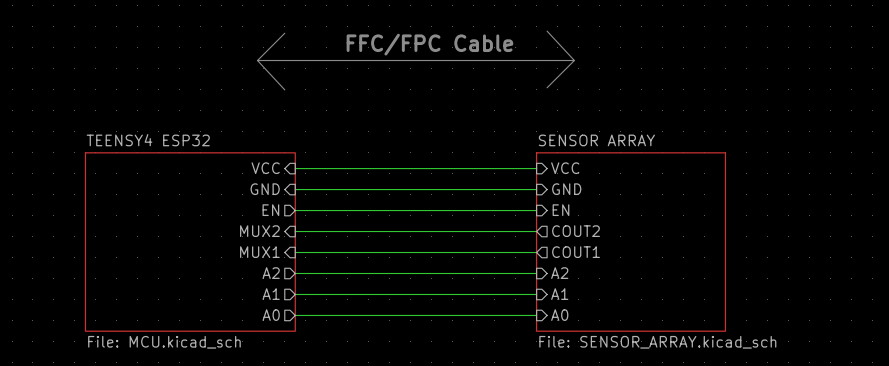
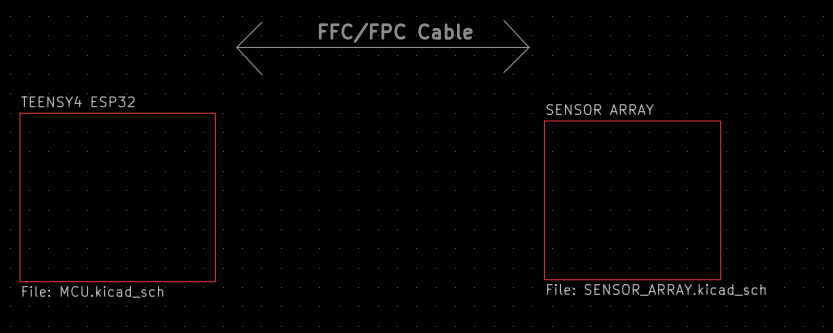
sheet TEENSY4 ESP32 shape: [84, 152, 296, 332] -> [19, 112, 217, 283]
sheet pin: VCC (265, 168) -> none
wire: (295, 168) (536, 168) -> none
sheet pin: VCC (565, 168) -> none
sheet pin: GND (265, 189) -> none
wire: (295, 189) (536, 189) -> none
sheet pin: GND (566, 189) -> none
sheet pin: EN (270, 210) -> none
wire: (295, 210) (536, 210) -> none
sheet pin: EN (560, 210) -> none
sheet SENSOR ARRAY: none -> File: SENSOR_ARRAY.kicad_sch (632, 200)
sheet pin: MUX2 (259, 231) -> none
wire: (295, 231) (536, 231) -> none
sheet pin: COUT2 (575, 231) -> none
sheet SENSOR ARRAY: File: SENSOR_ARRAY.kicad_sch (631, 242) -> none
sheet pin: MUX1 (259, 252) -> none
wire: (295, 252) (536, 252) -> none
sheet pin: COUT1 (575, 252) -> none
sheet pin: A2 (271, 273) -> none
wire: (295, 273) (536, 273) -> none
sheet pin: A2 (559, 273) -> none
sheet pin: A1 (271, 294) -> none
wire: (295, 294) (536, 294) -> none
sheet pin: A1 (559, 294) -> none
sheet pin: A0 (271, 315) -> none
wire: (295, 315) (536, 315) -> none
sheet pin: A0 (559, 315) -> none

